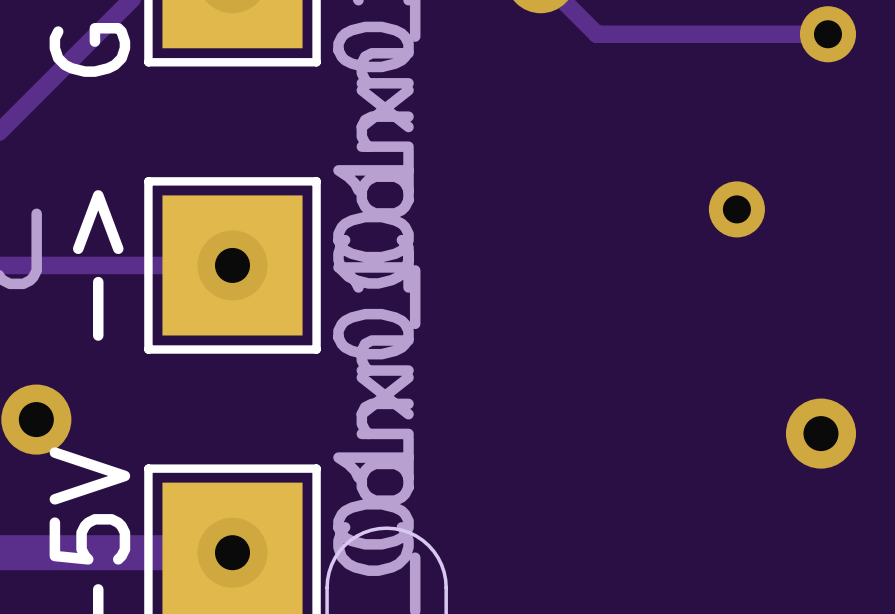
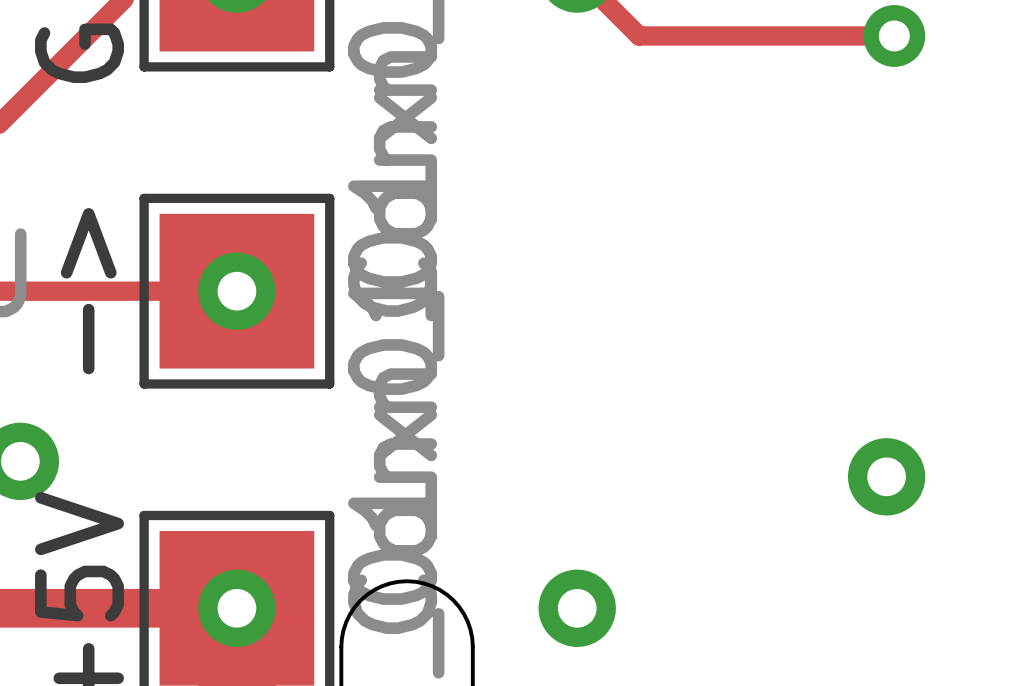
via: (736, 209) -> none
via: none -> (577, 608)

